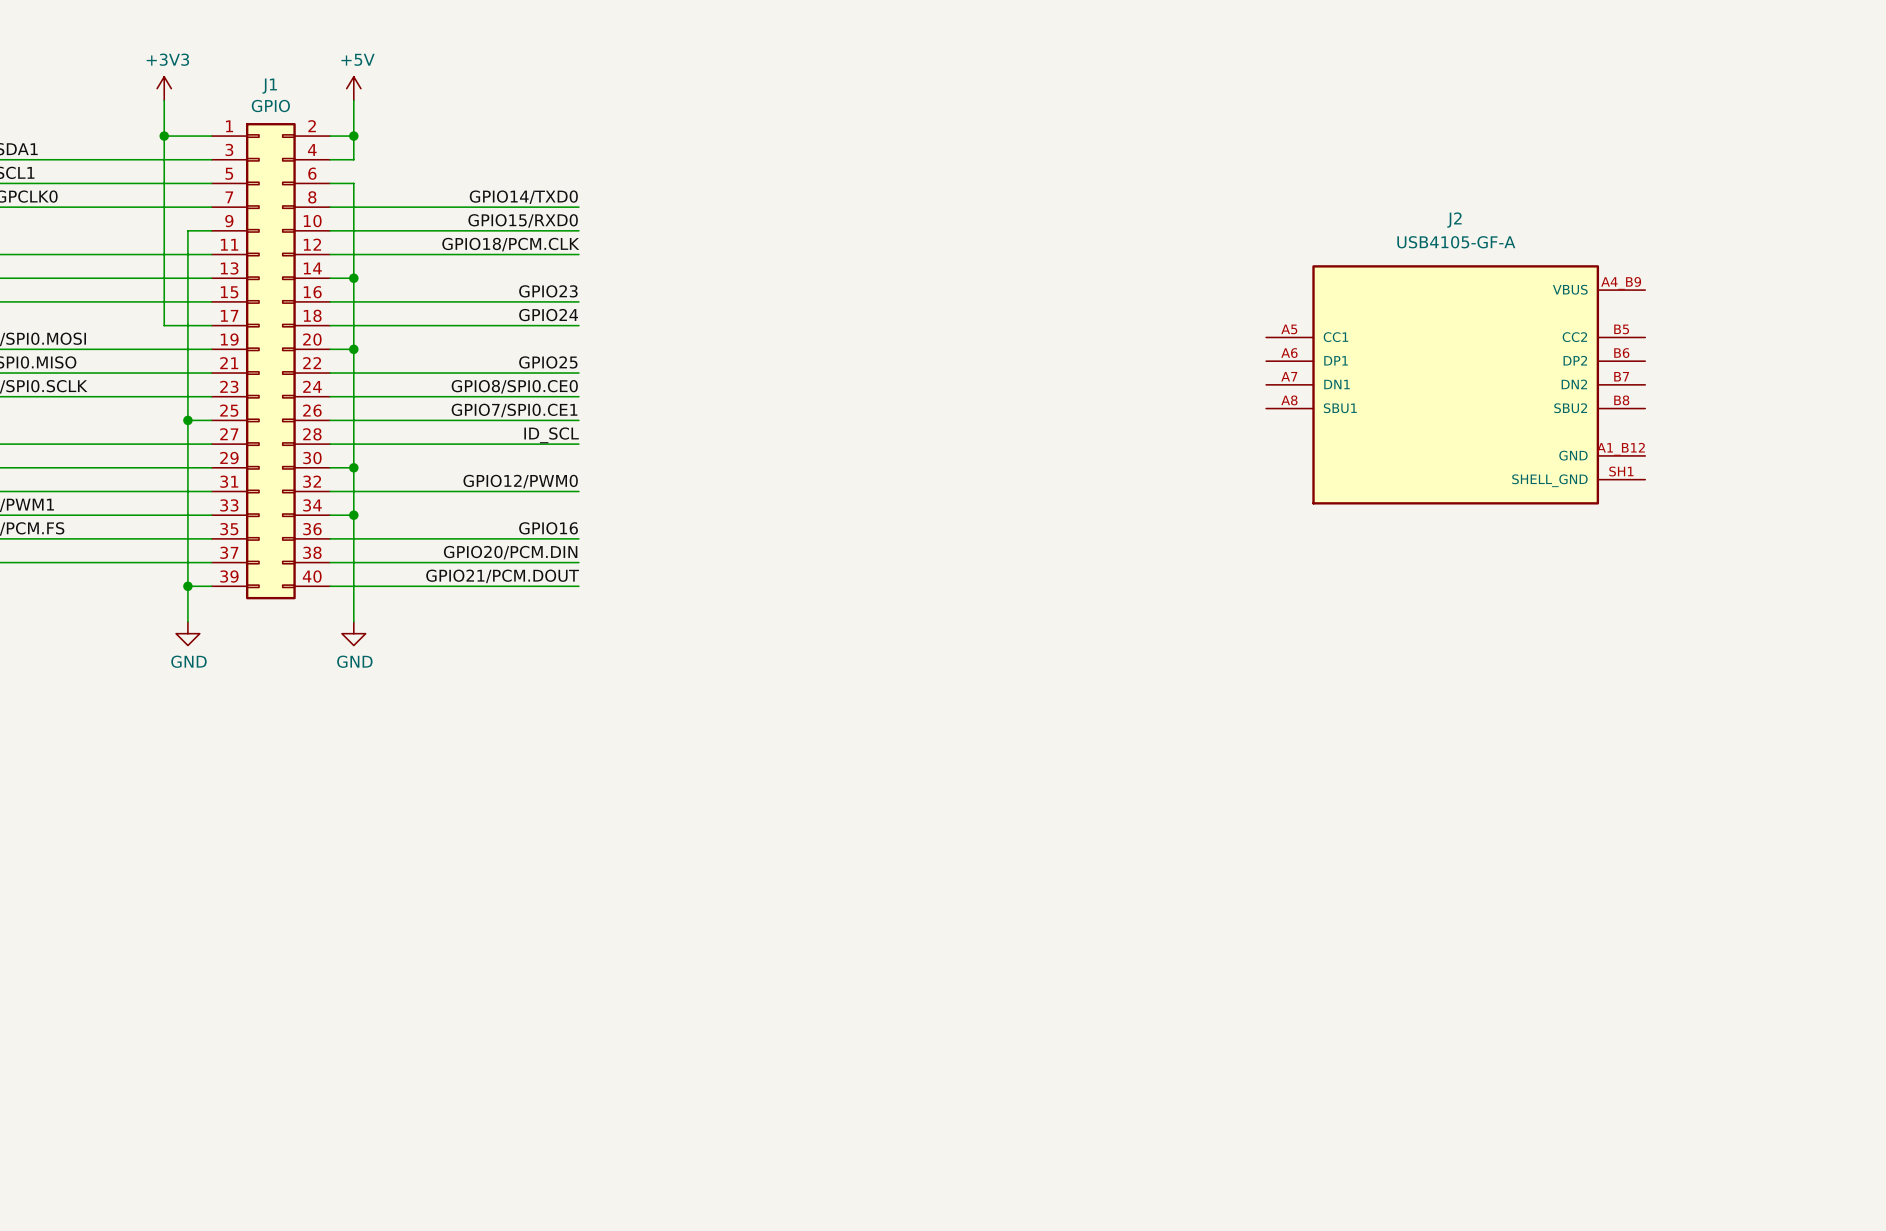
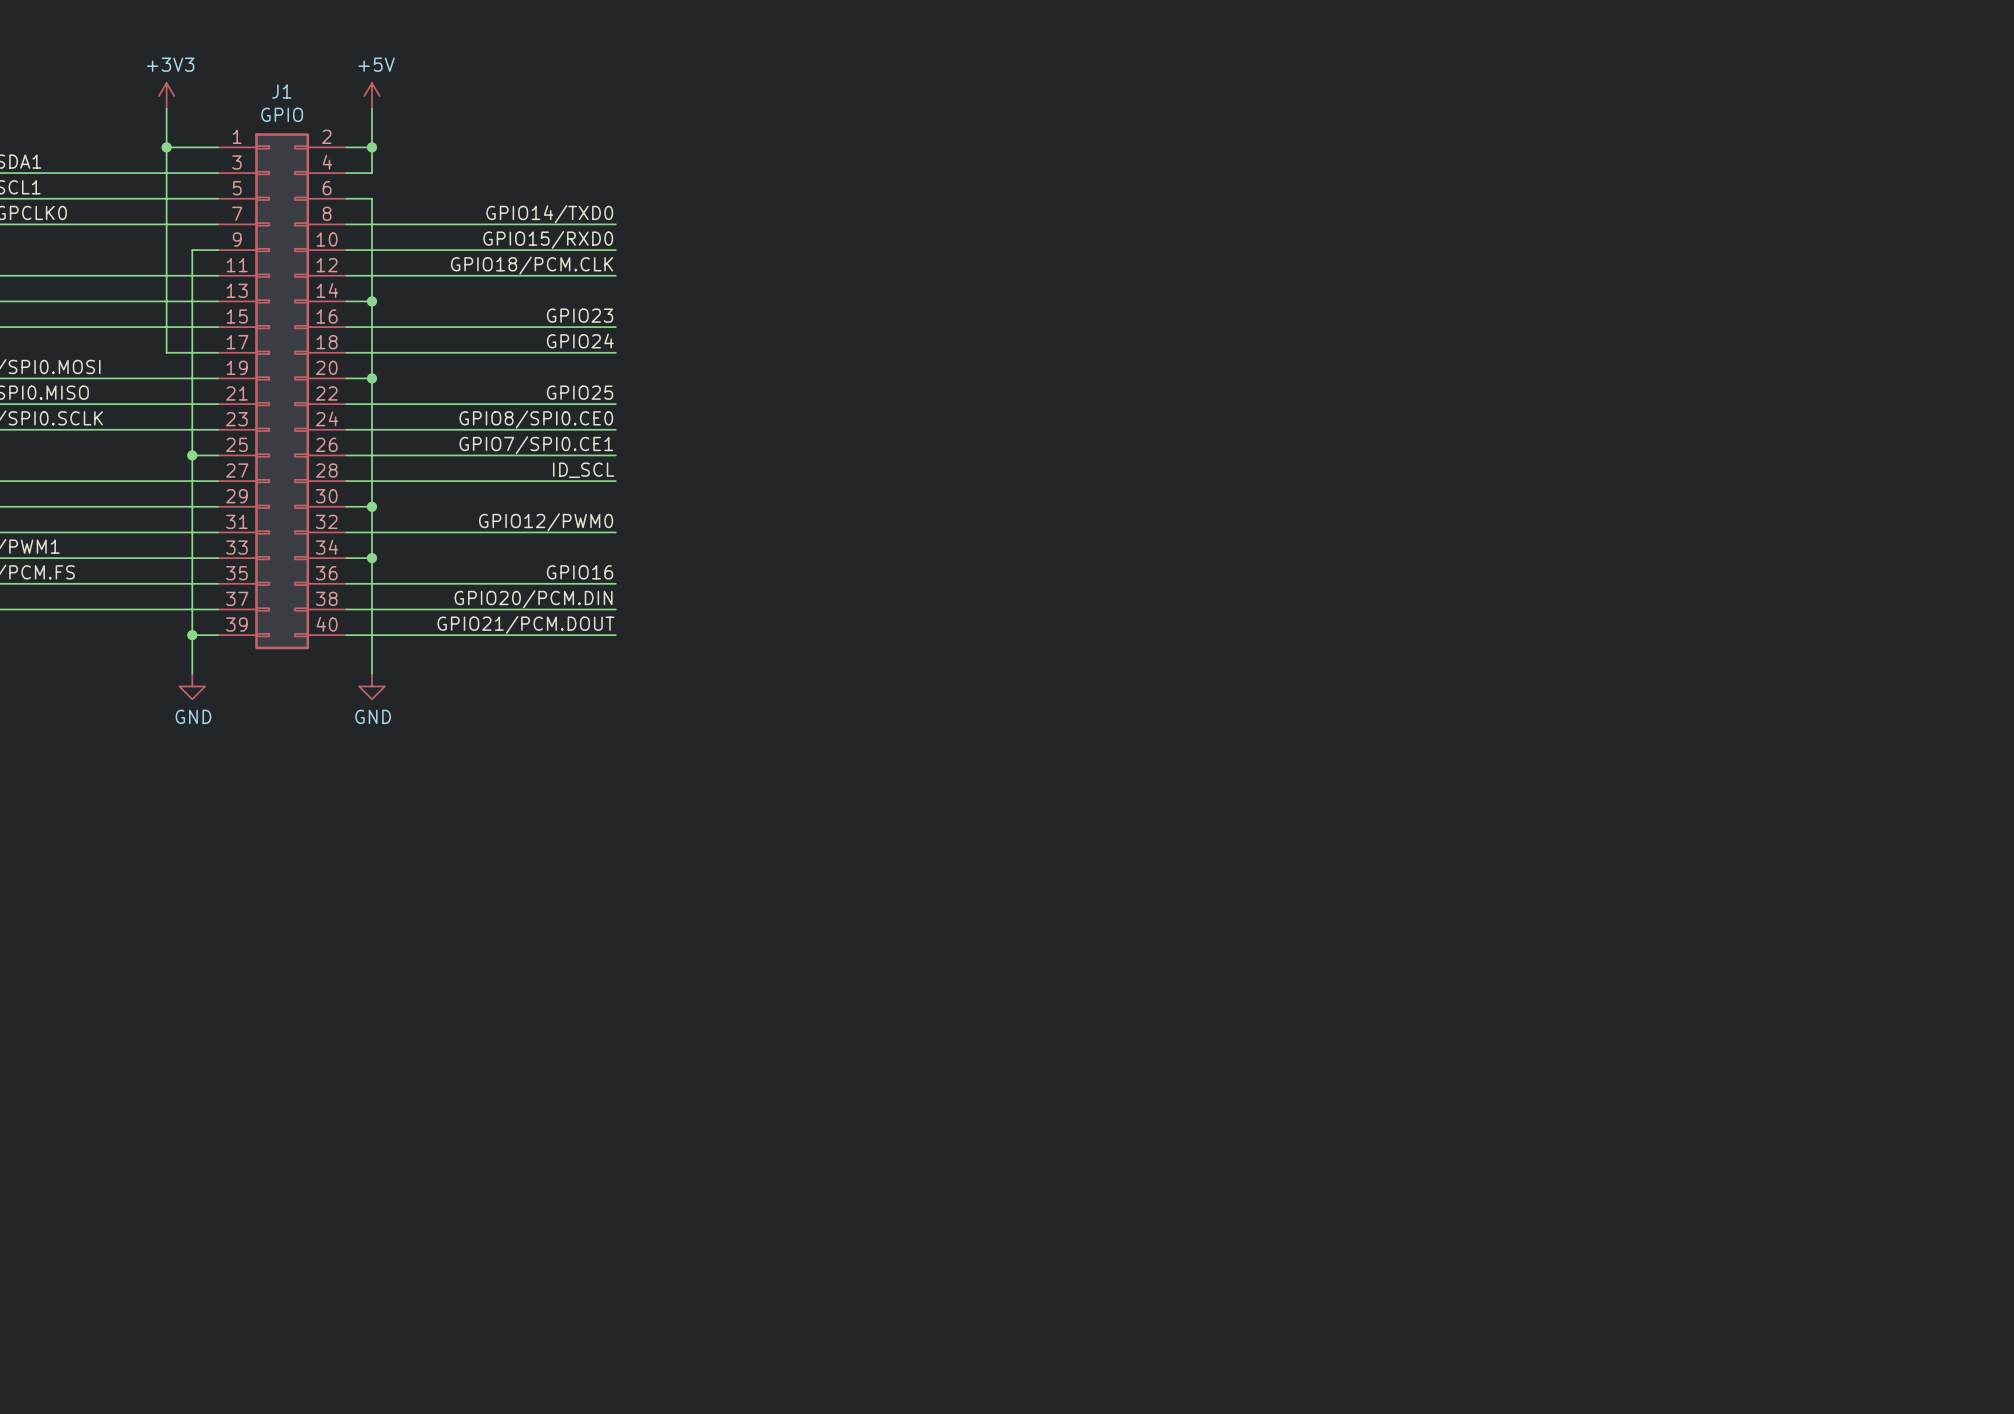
J2: USB4105-GF-A (1455, 384) -> none

